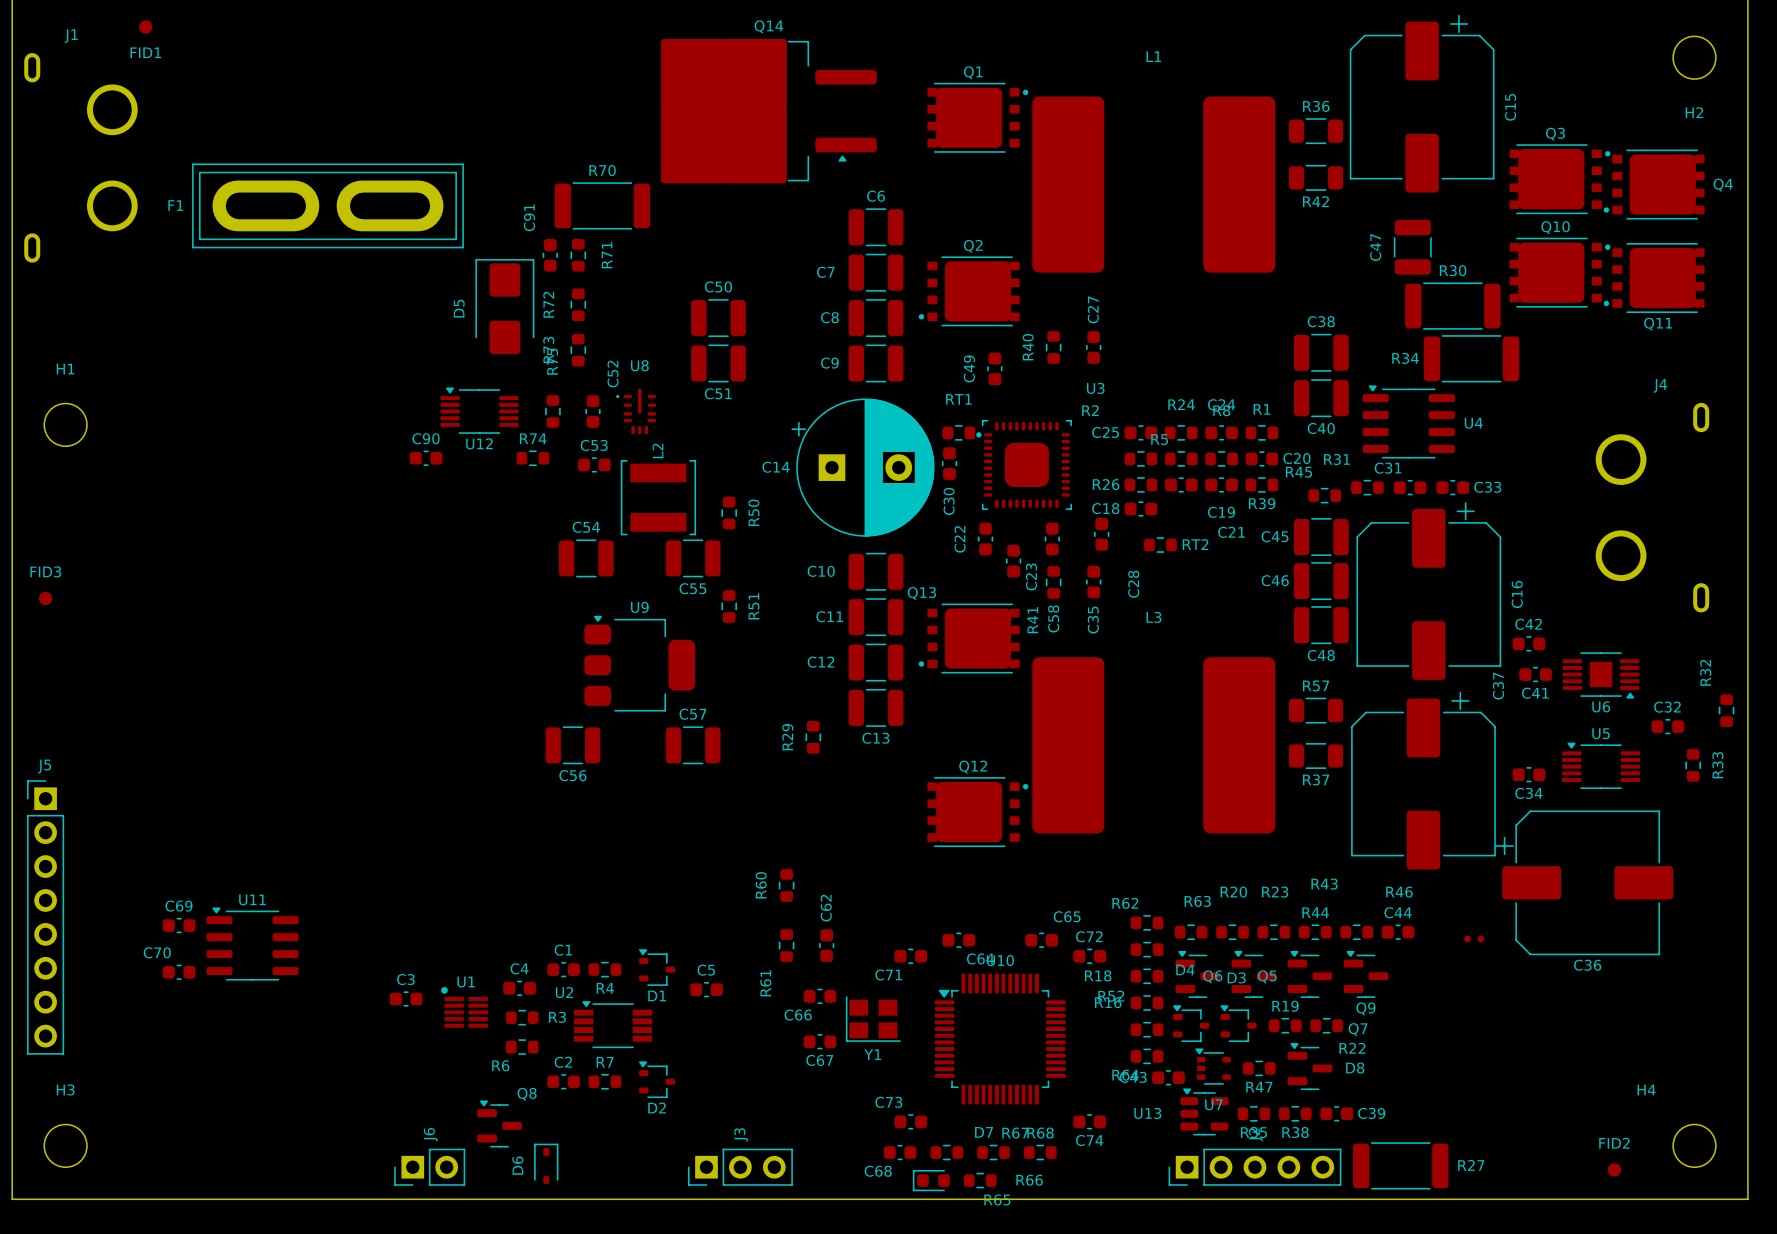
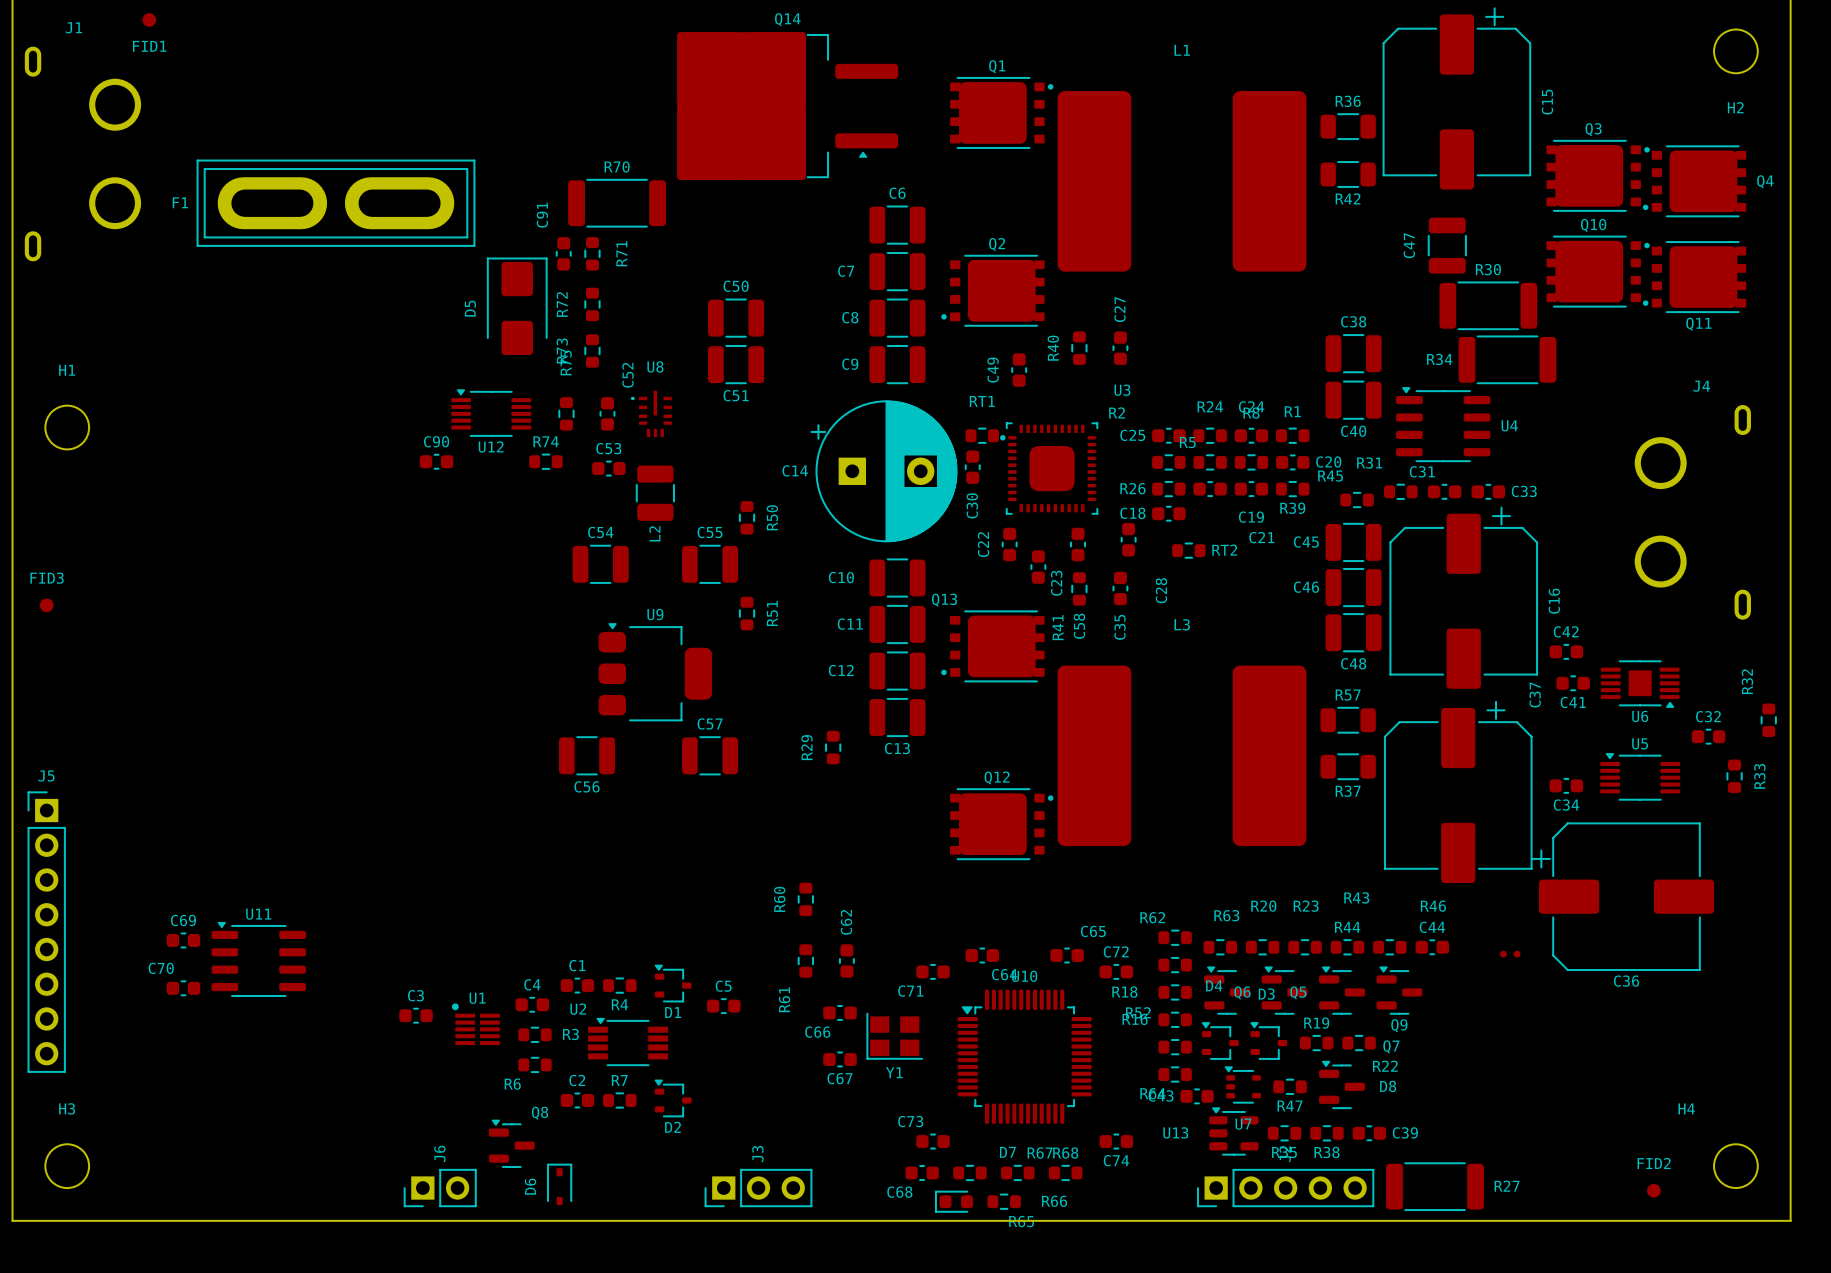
L2 name position: L2 (657, 450) -> L2 (654, 533)
L2 footprint: [620, 460, 697, 536] -> [635, 465, 675, 521]
C55 name position: C55 (692, 588) -> C55 (709, 532)

